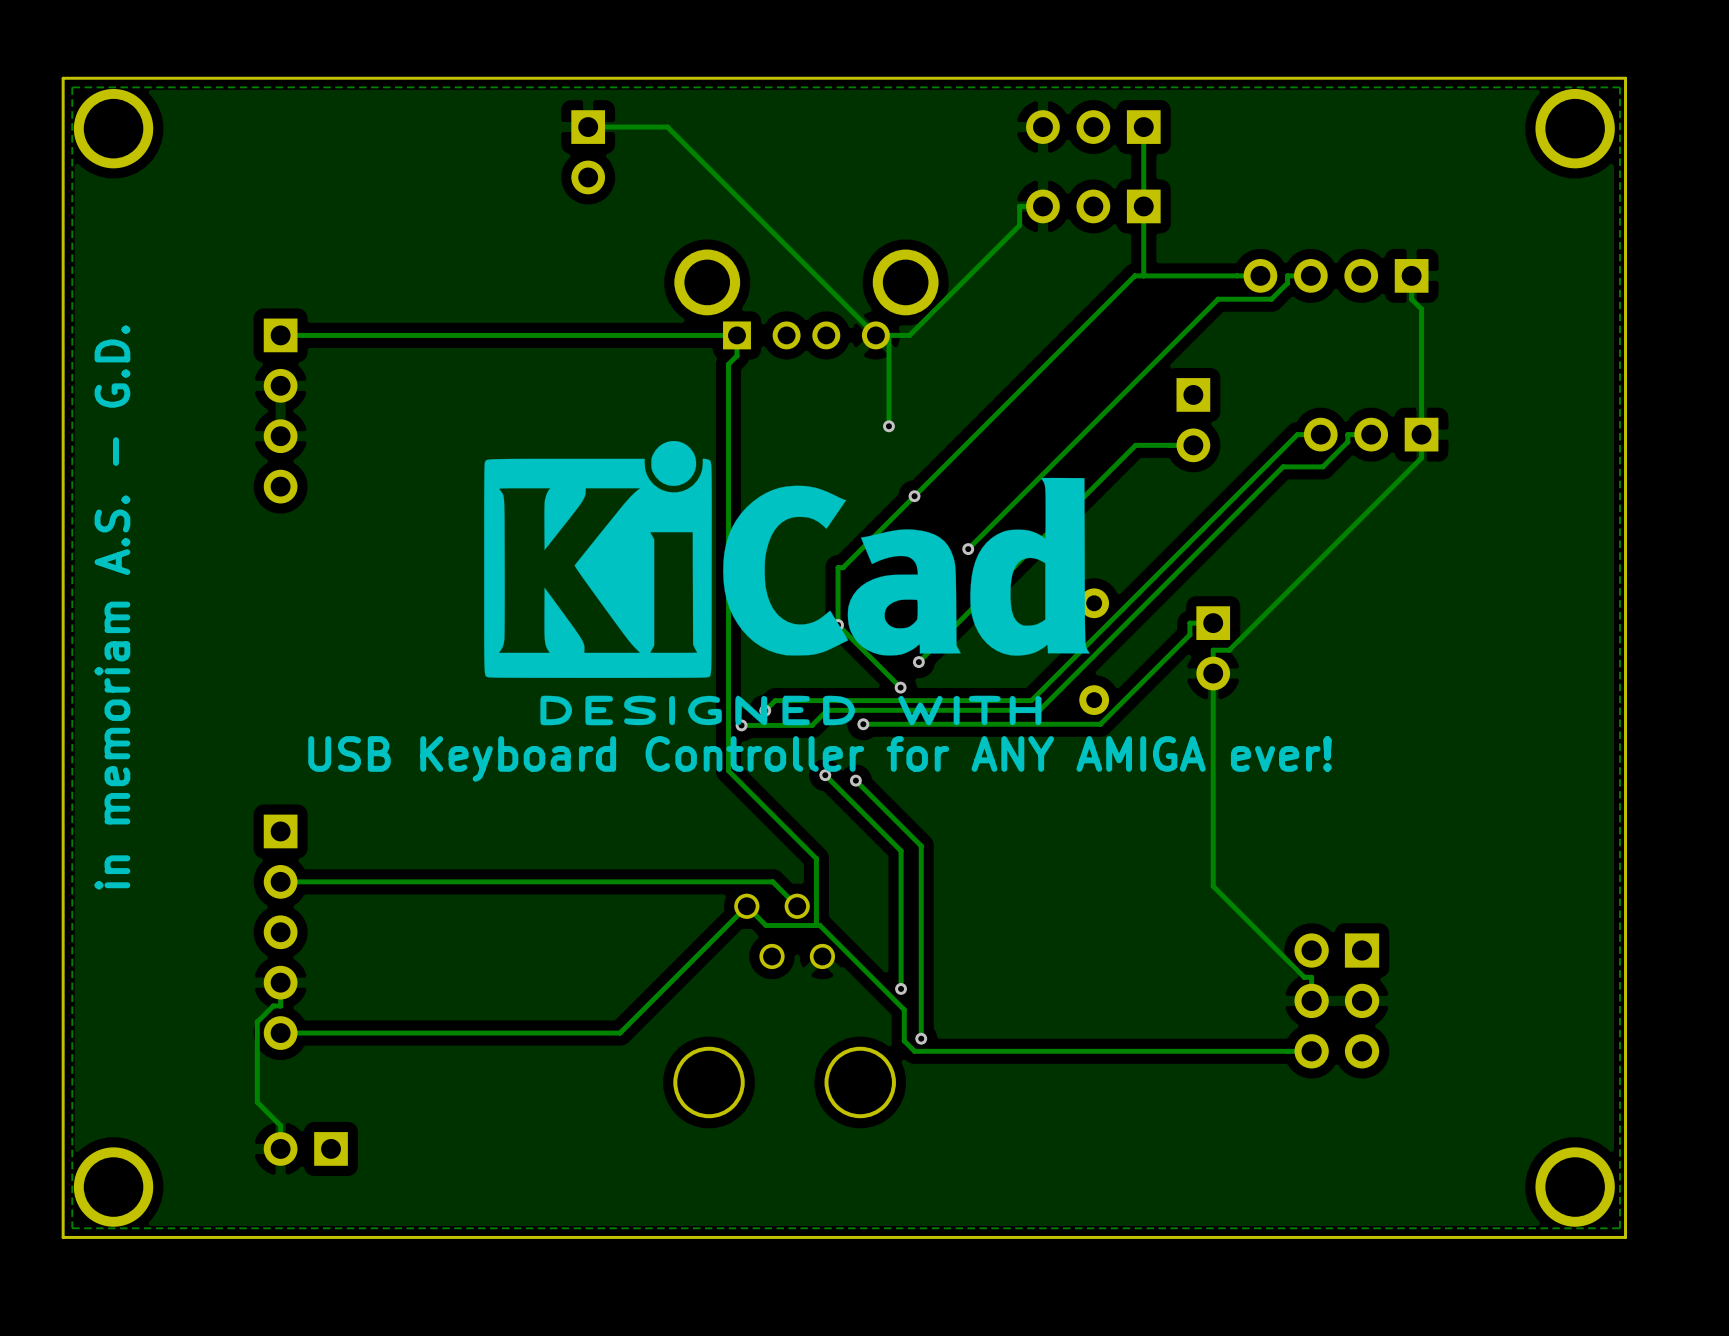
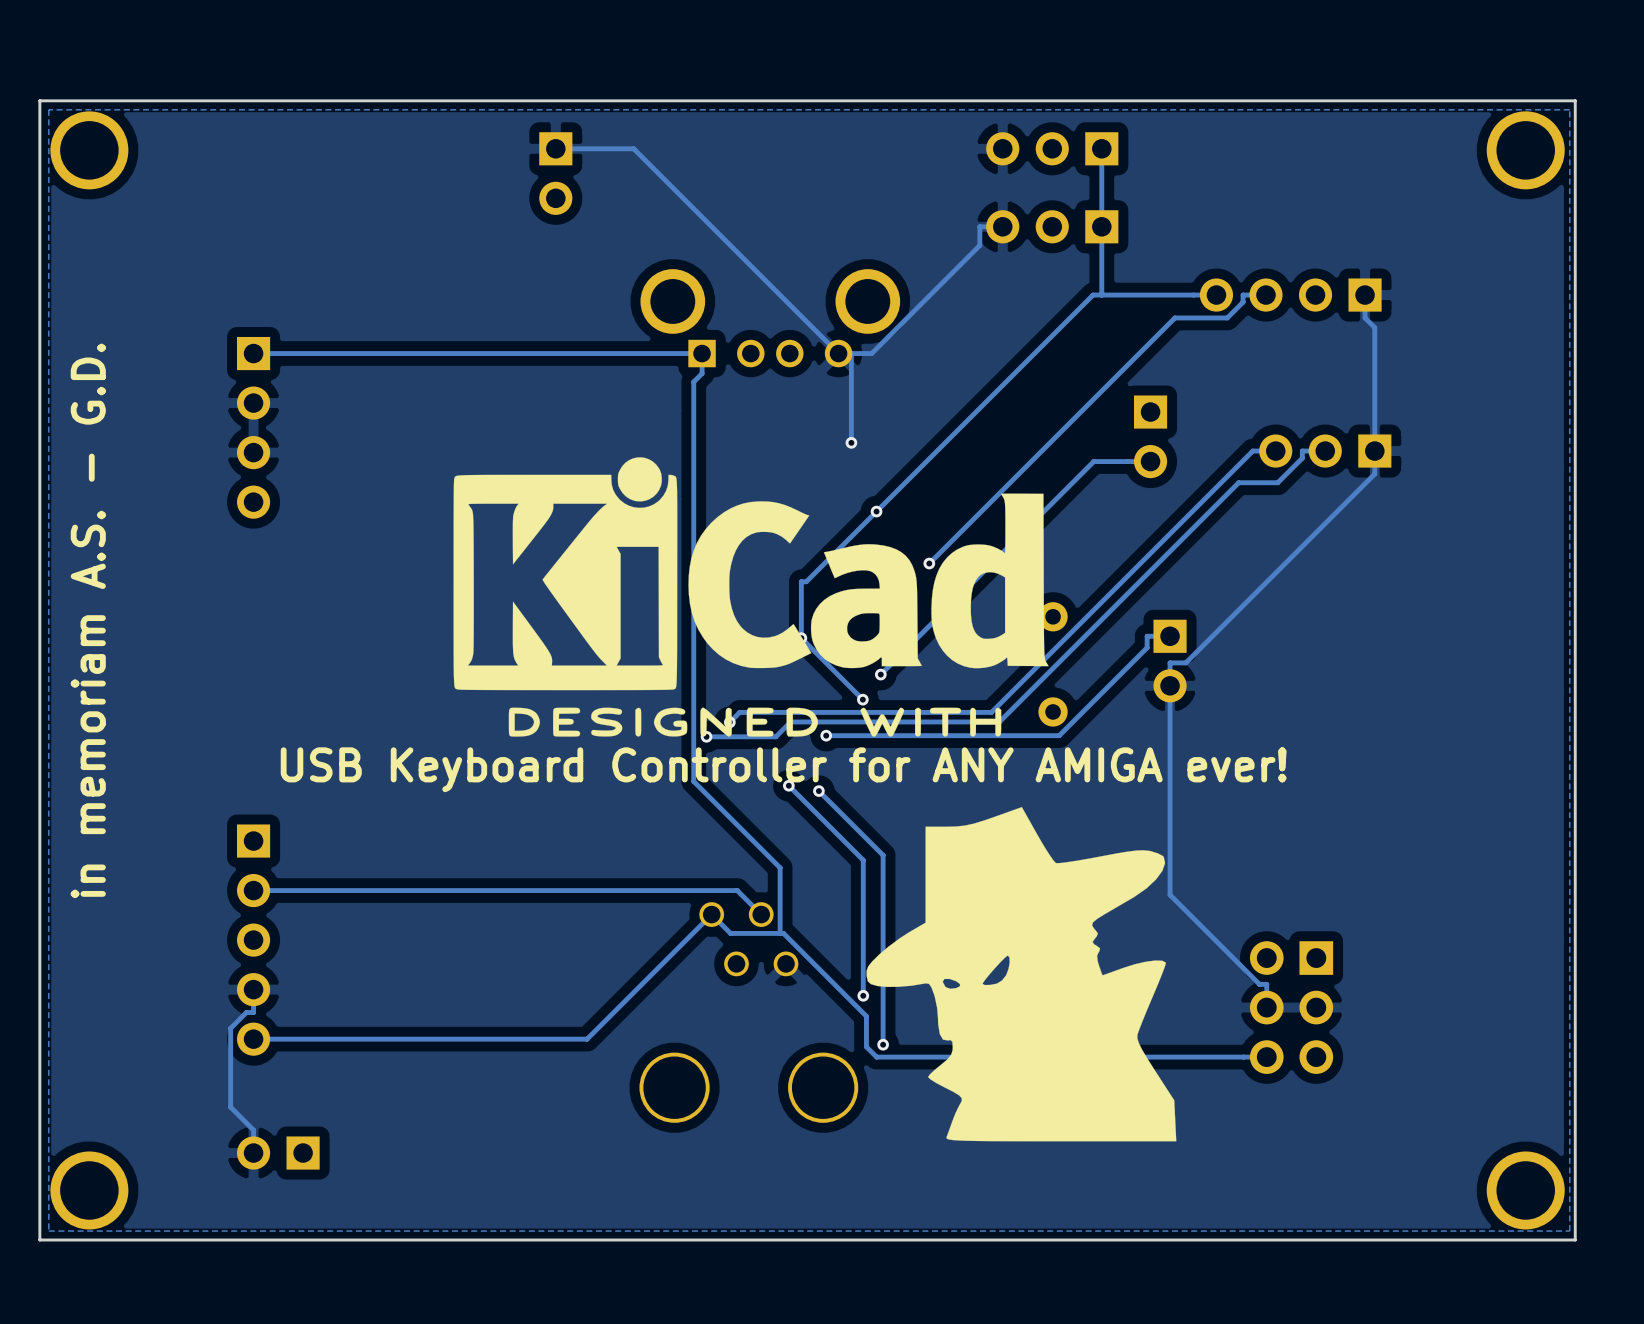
drawing: none -> [866, 807, 1177, 1142]

